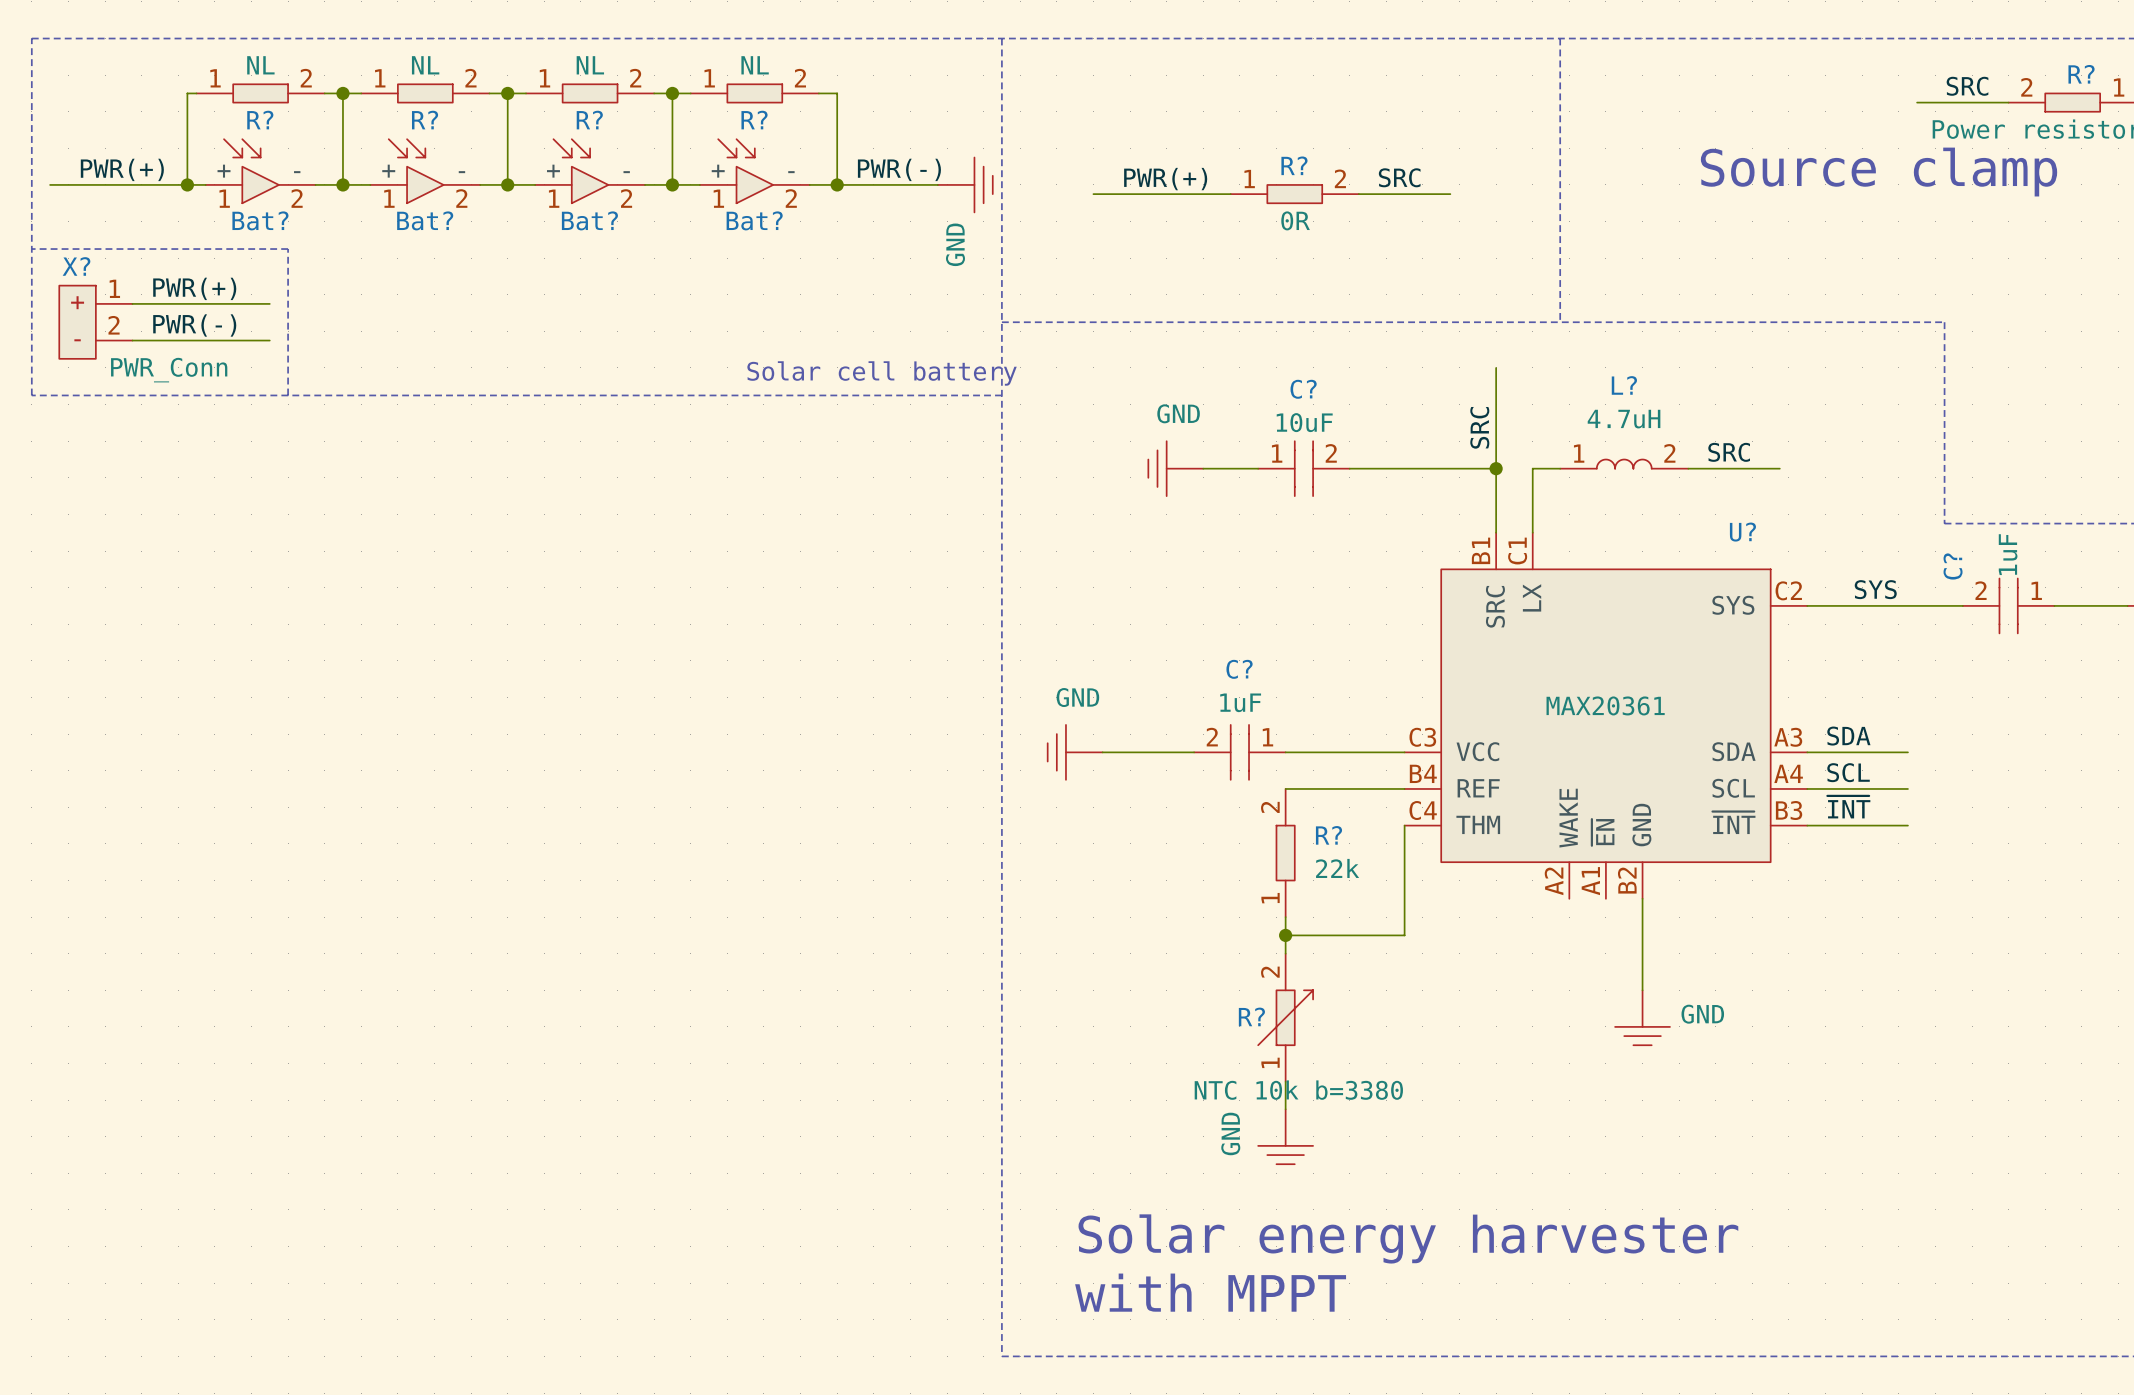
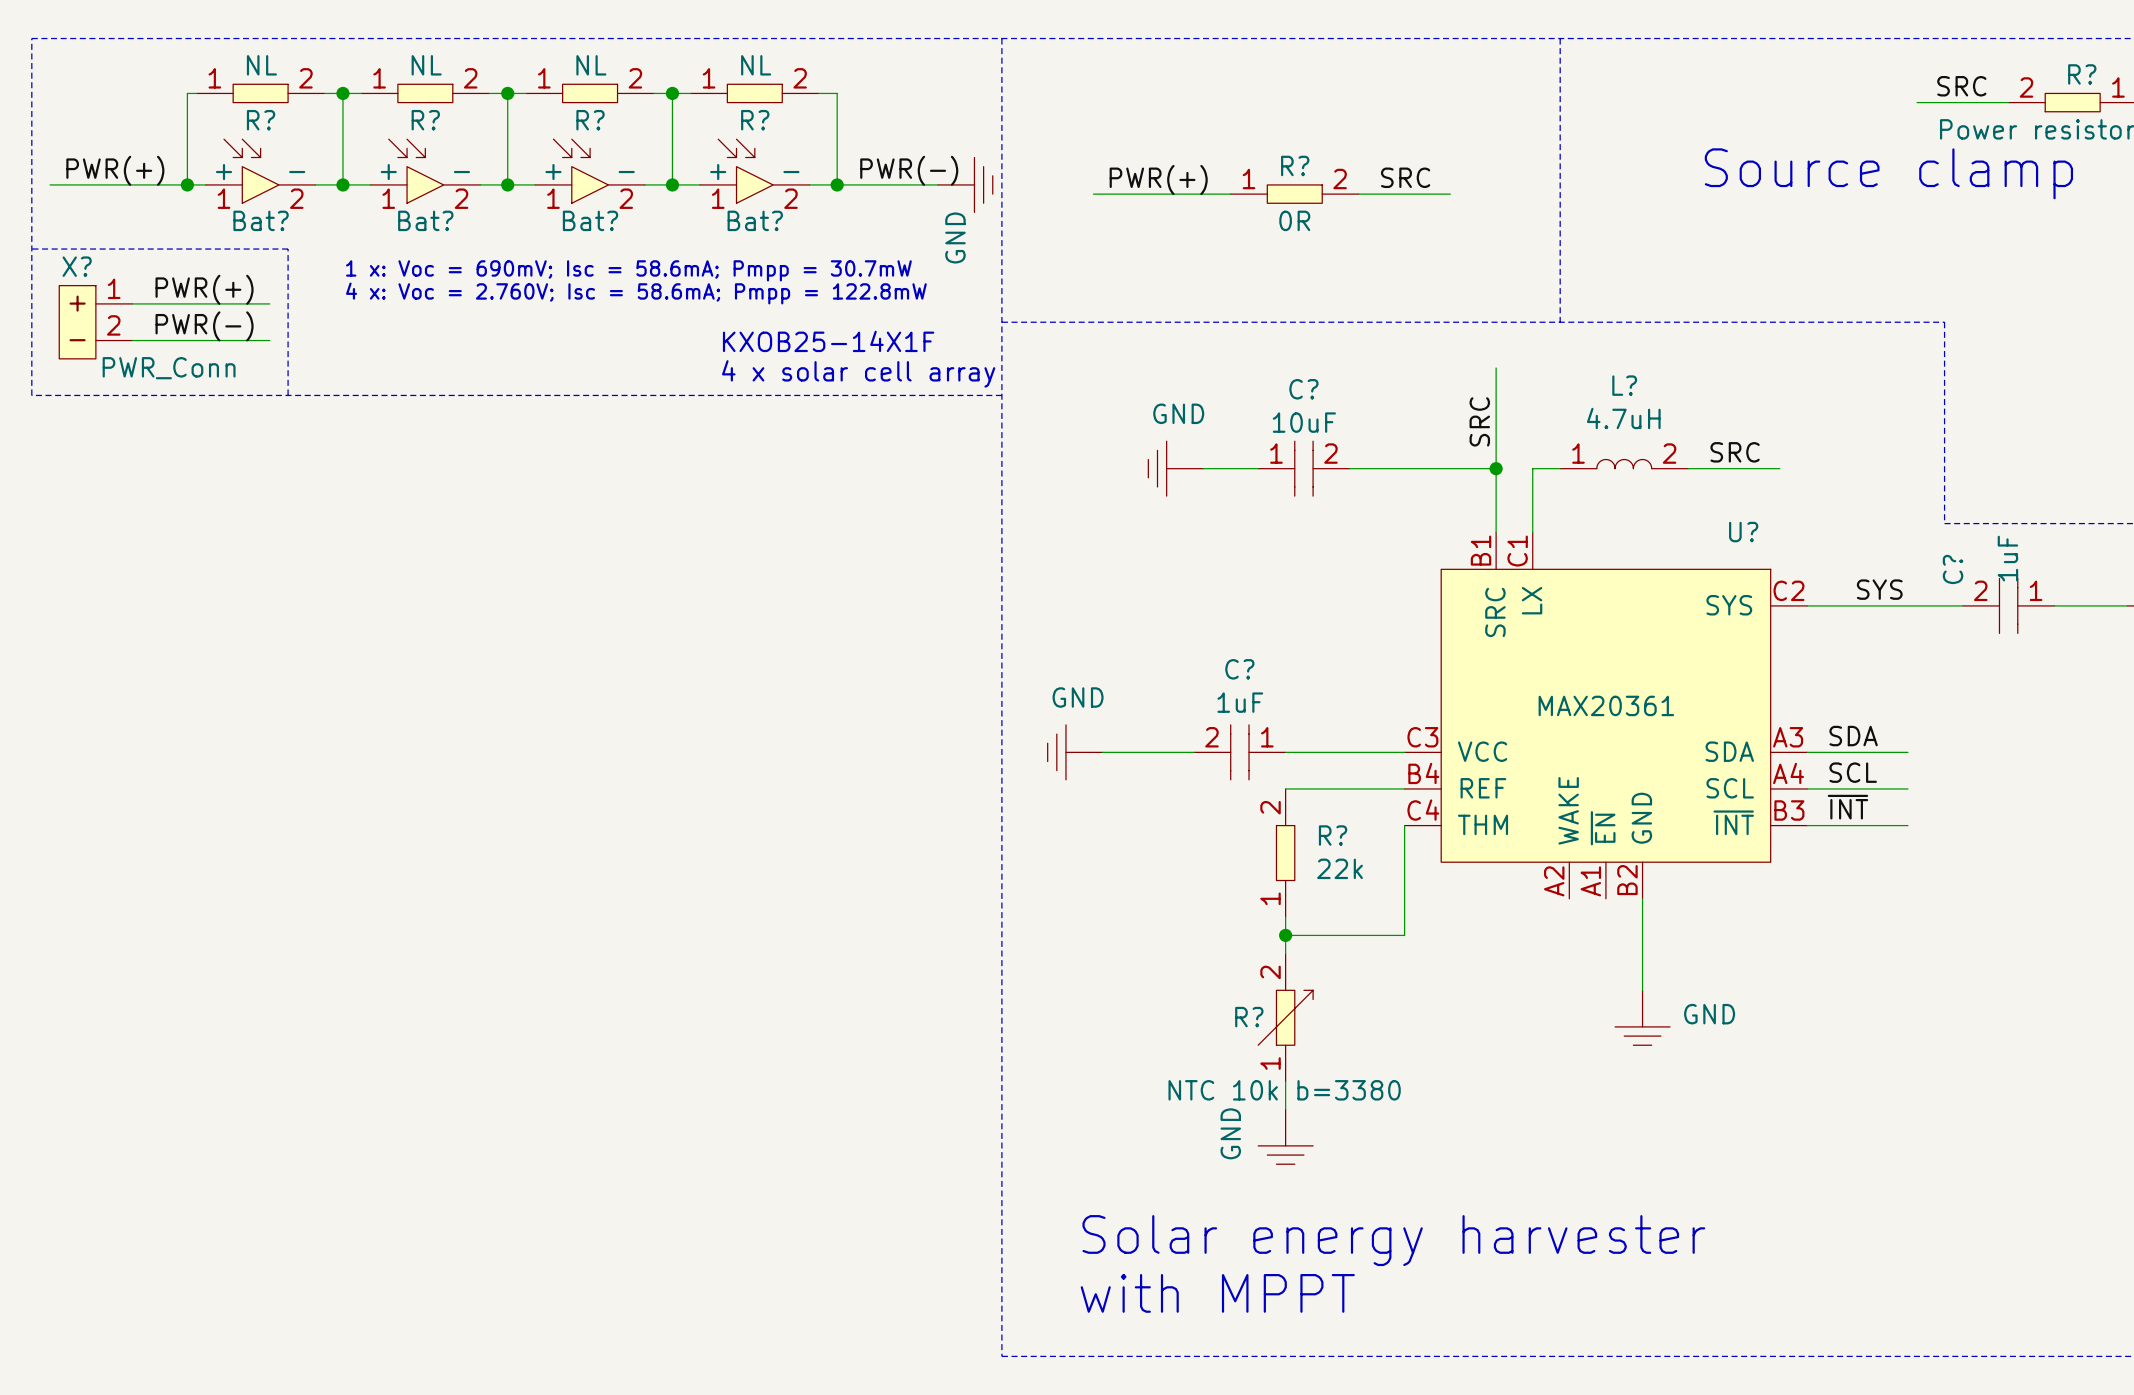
text: none -> 1 x: Voc = 690mV; Isc = 58.6mA; Pmpp = 30.7mW (628, 270)
text: none -> 4 x: Voc = 2.760V; Isc = 58.6mA; Pmpp = 122.8mW (636, 293)
text: none -> KXOB25-14X1F (828, 341)
text: Solar cell battery (882, 373) -> 4 x solar cell array (858, 373)

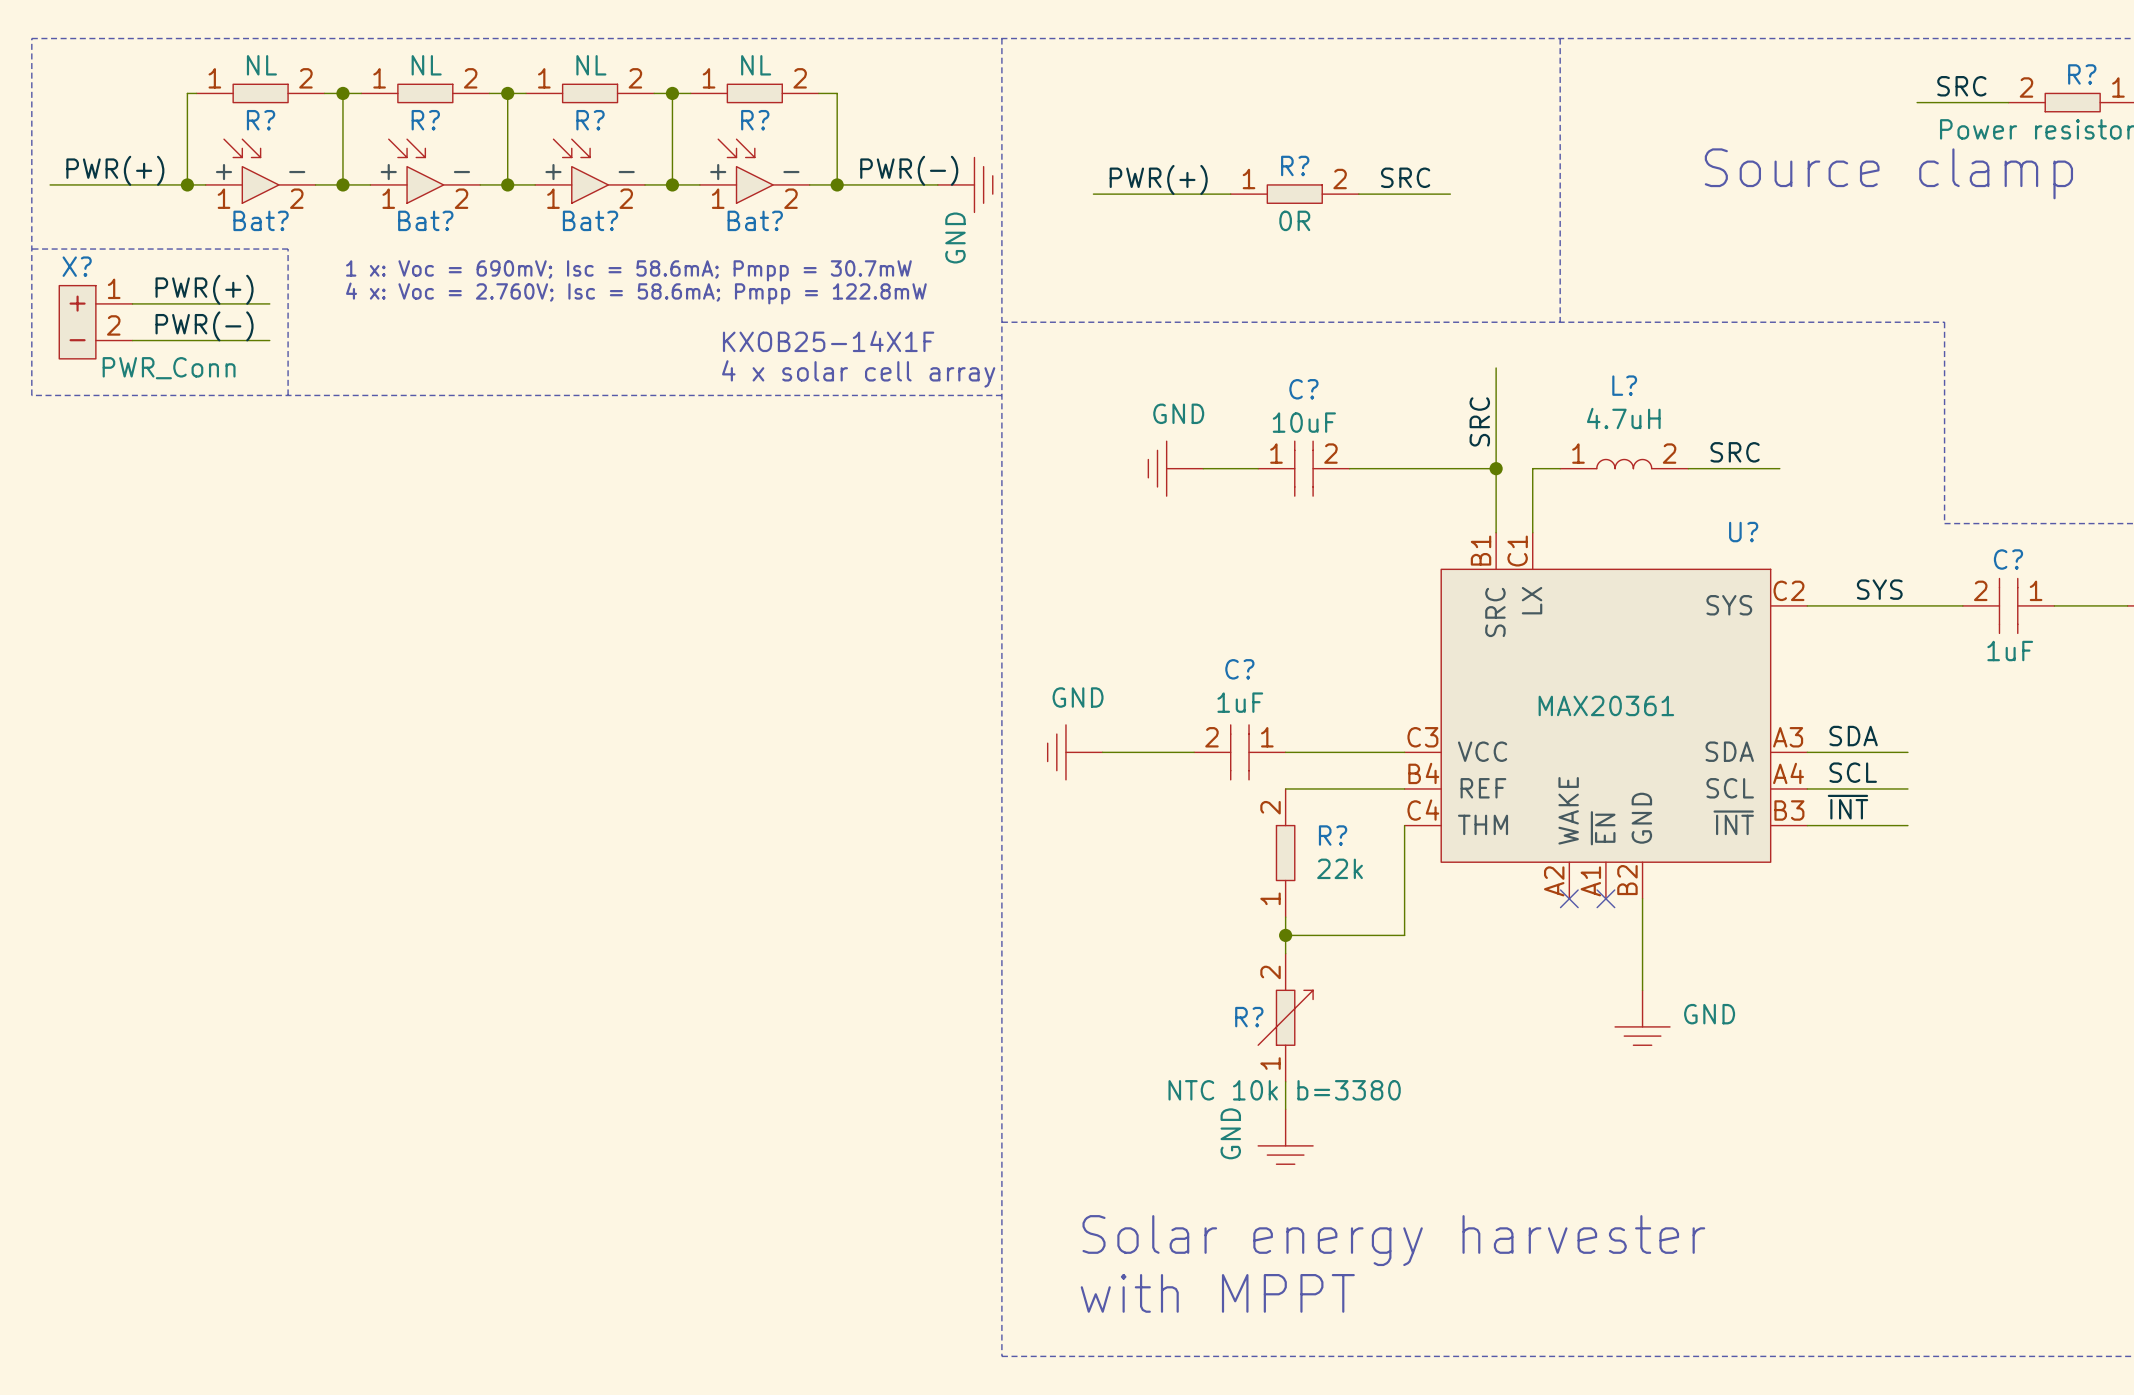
C? value rotation: 0° (2007, 558) -> 90° clockwise (2010, 651)
C? value position: 1uF (2007, 558) -> 1uF (2010, 651)
C? name rotation: 0° (1953, 569) -> 90° clockwise (2008, 559)
C? name position: C? (1953, 569) -> C? (2008, 559)
no-connect mark: none -> (1569, 898)
no-connect mark: none -> (1605, 898)

